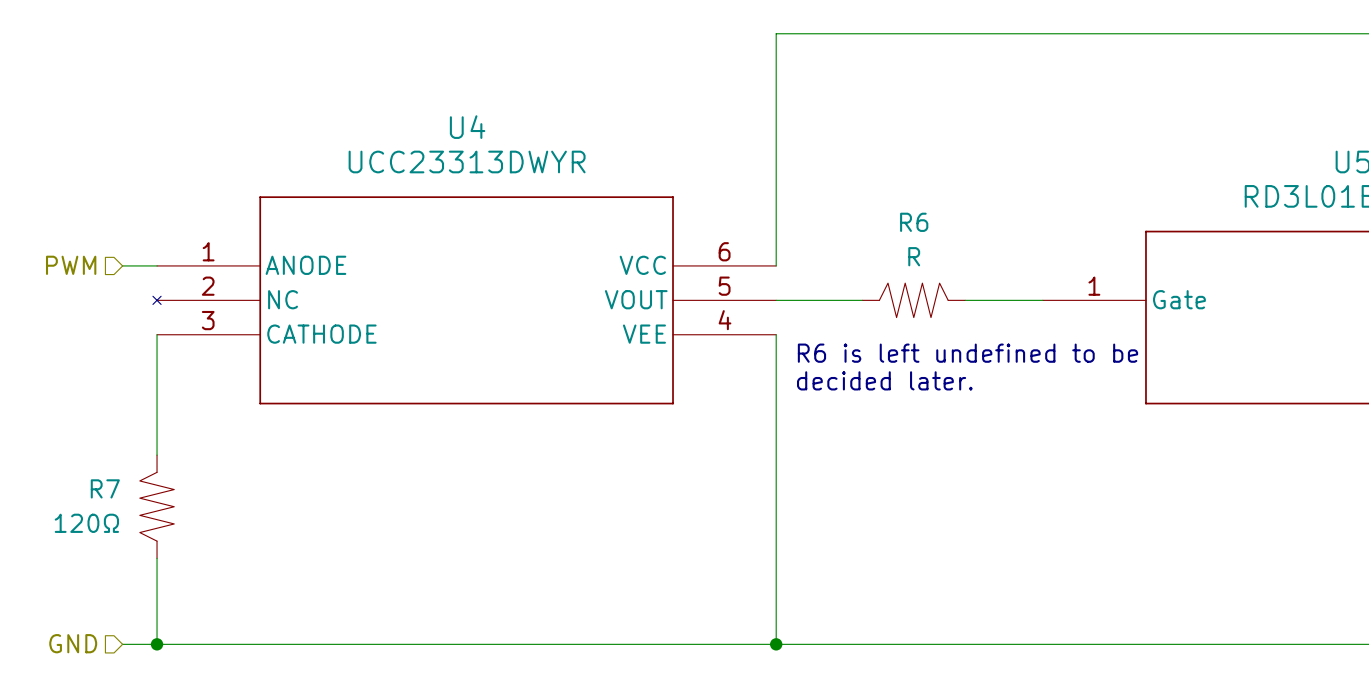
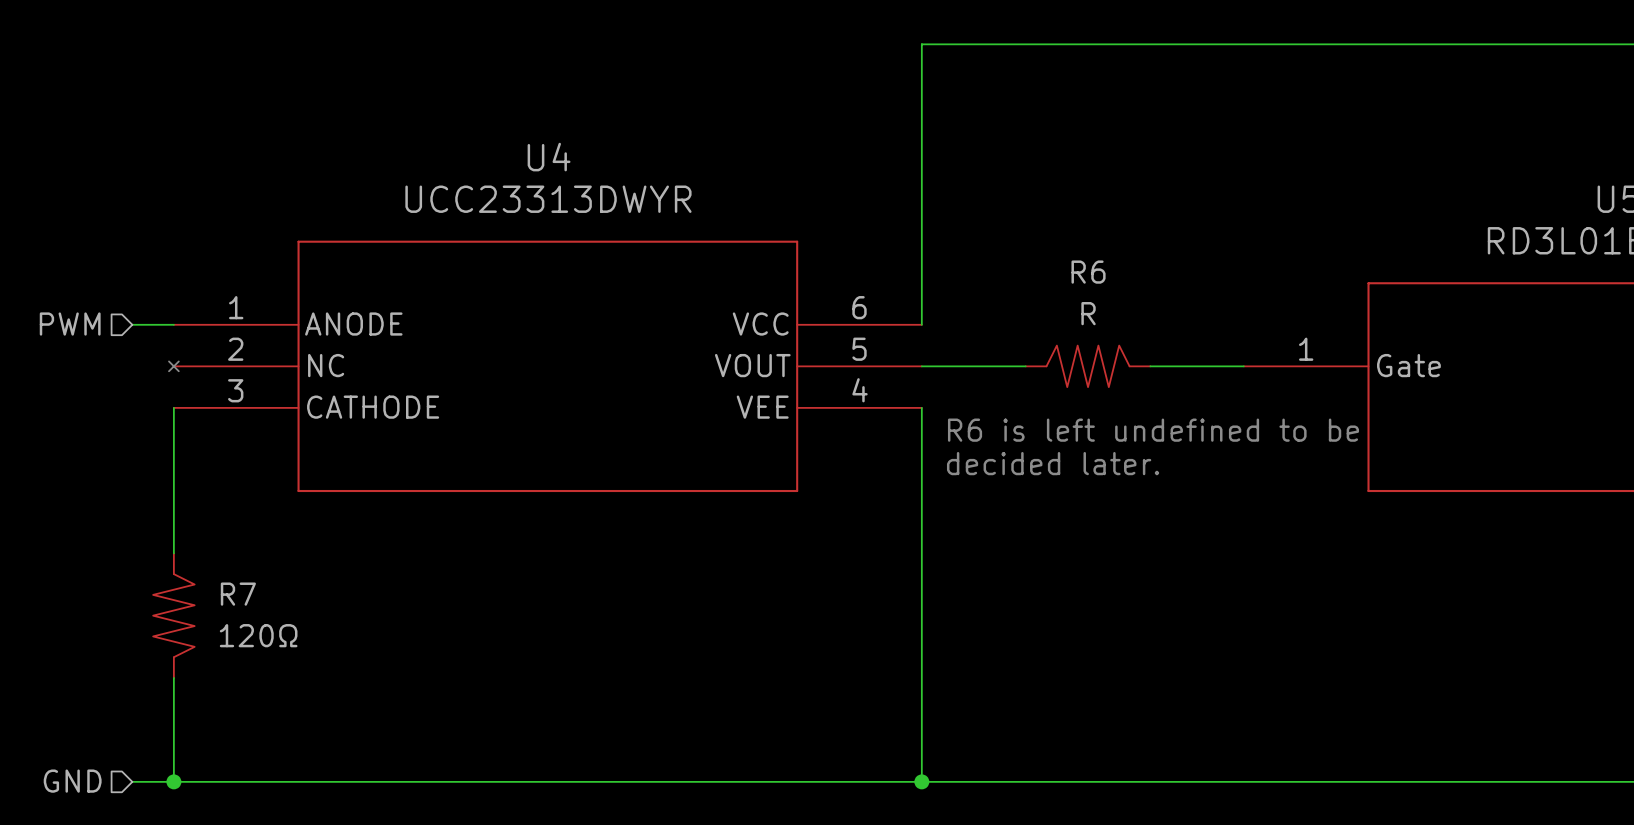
R7 name position: R7 (105, 488) -> R7 (238, 594)
R7 rotation: 0° (157, 506) -> 180° (173, 615)
R7 value position: 120Ω (86, 523) -> 120Ω (258, 635)

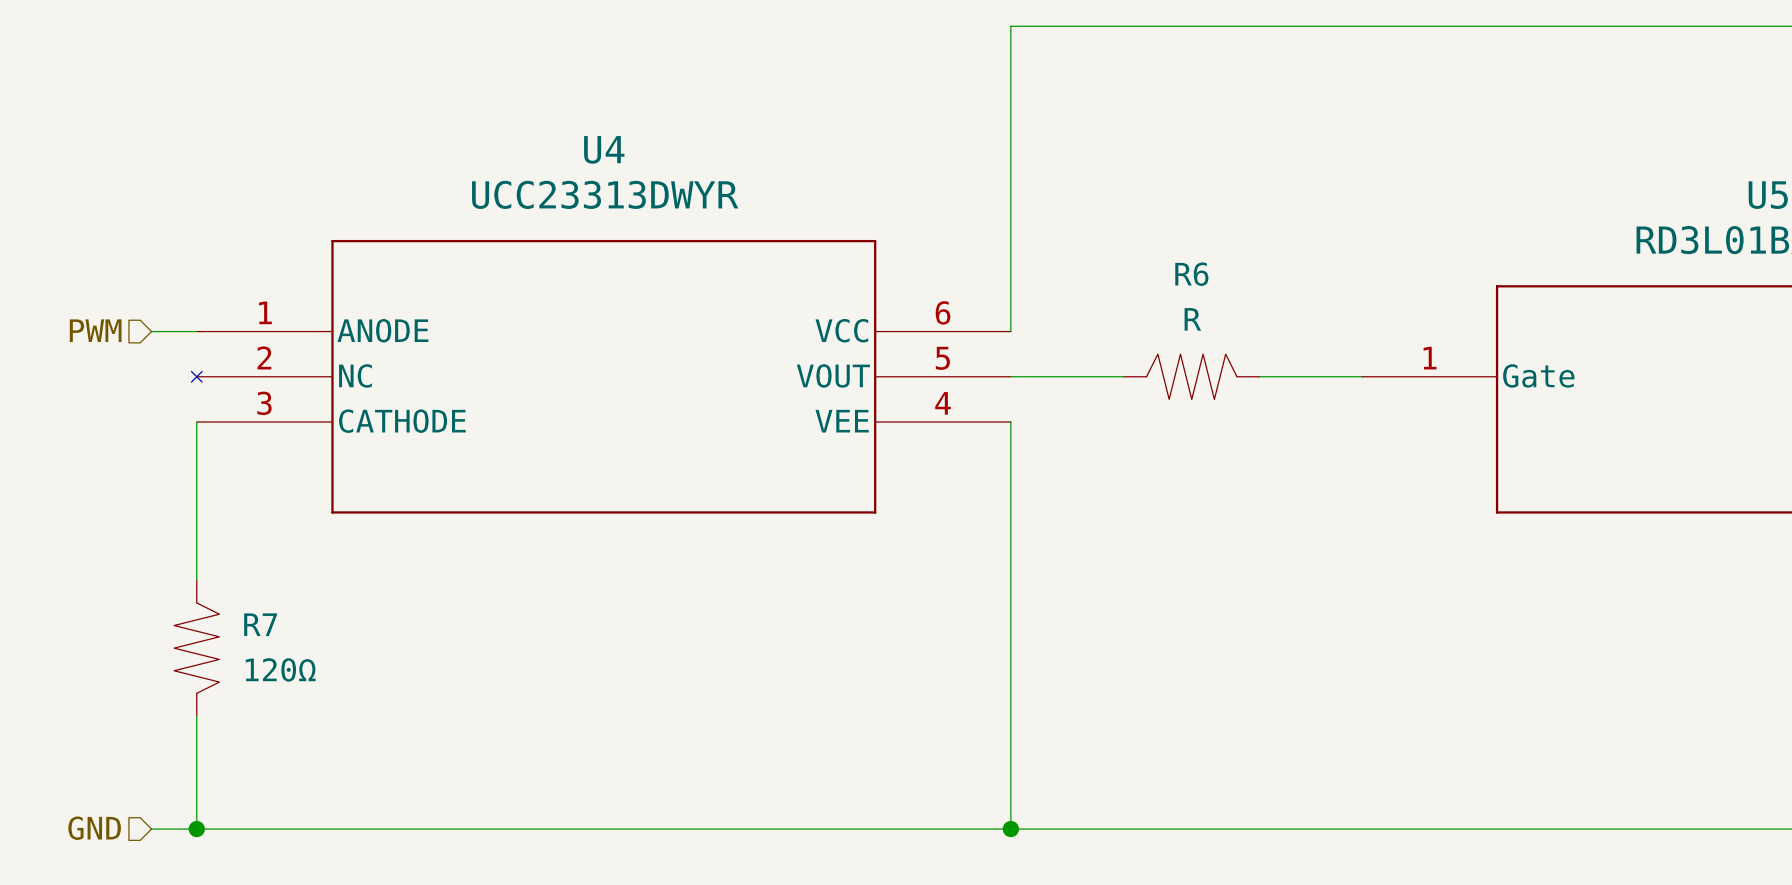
text: R6 is left undefined to be (1153, 430) -> none
text: decided later. (1053, 463) -> none

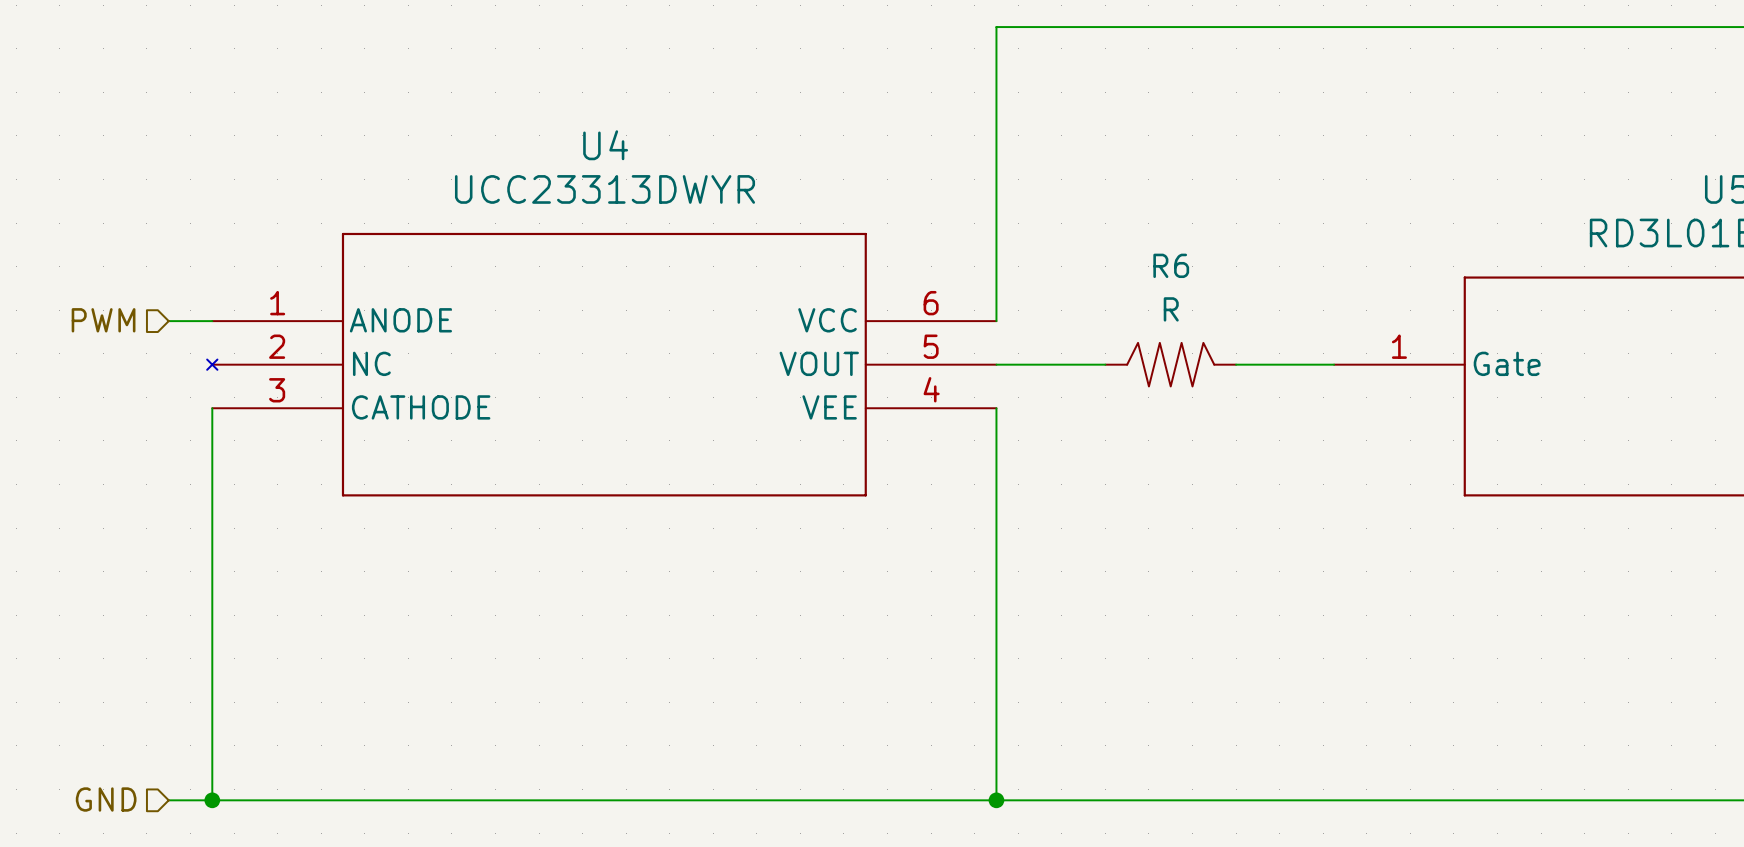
wire: none -> (212, 560) (212, 691)
R7: 120Ω (196, 648) -> none

